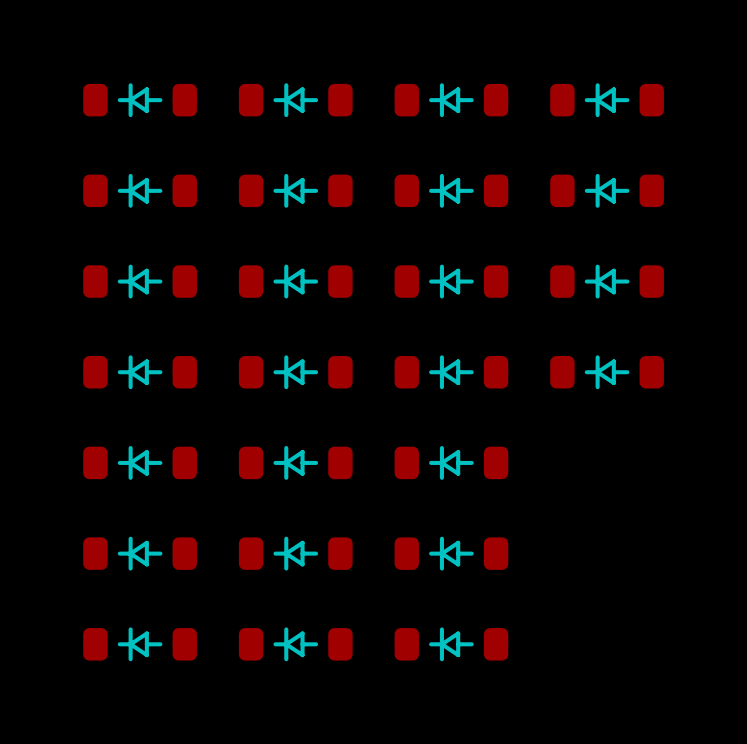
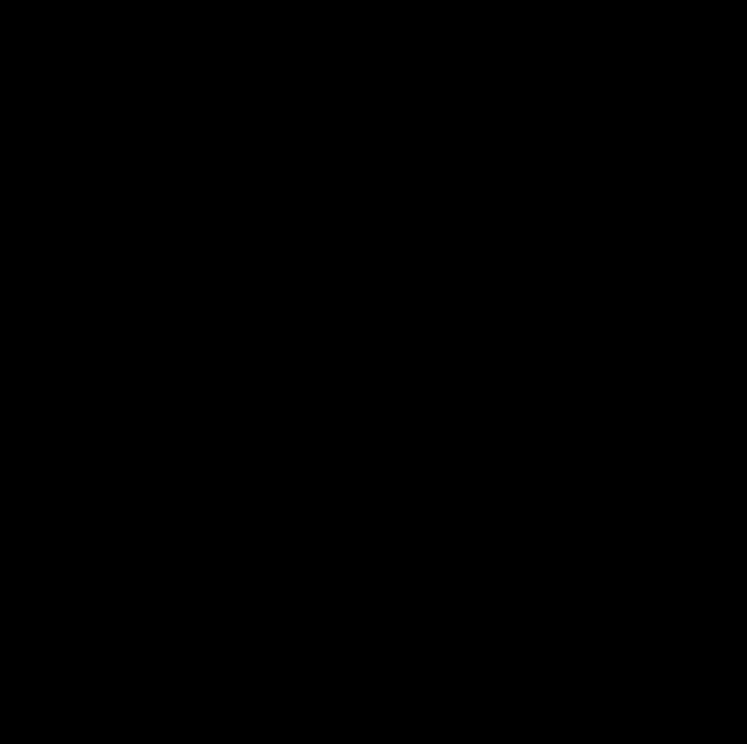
part: (140, 100) -> none
part: (295, 100) -> none
part: (451, 100) -> none
part: (607, 100) -> none
part: (140, 190) -> none
part: (295, 190) -> none
part: (451, 190) -> none
part: (607, 190) -> none
part: (140, 281) -> none
part: (295, 281) -> none
part: (451, 281) -> none
part: (607, 281) -> none
part: (140, 372) -> none
part: (295, 372) -> none
part: (451, 372) -> none
part: (607, 372) -> none
part: (140, 462) -> none
part: (295, 462) -> none
part: (451, 462) -> none
part: (140, 553) -> none
part: (295, 553) -> none
part: (451, 553) -> none
part: (140, 644) -> none
part: (295, 644) -> none
part: (451, 644) -> none

